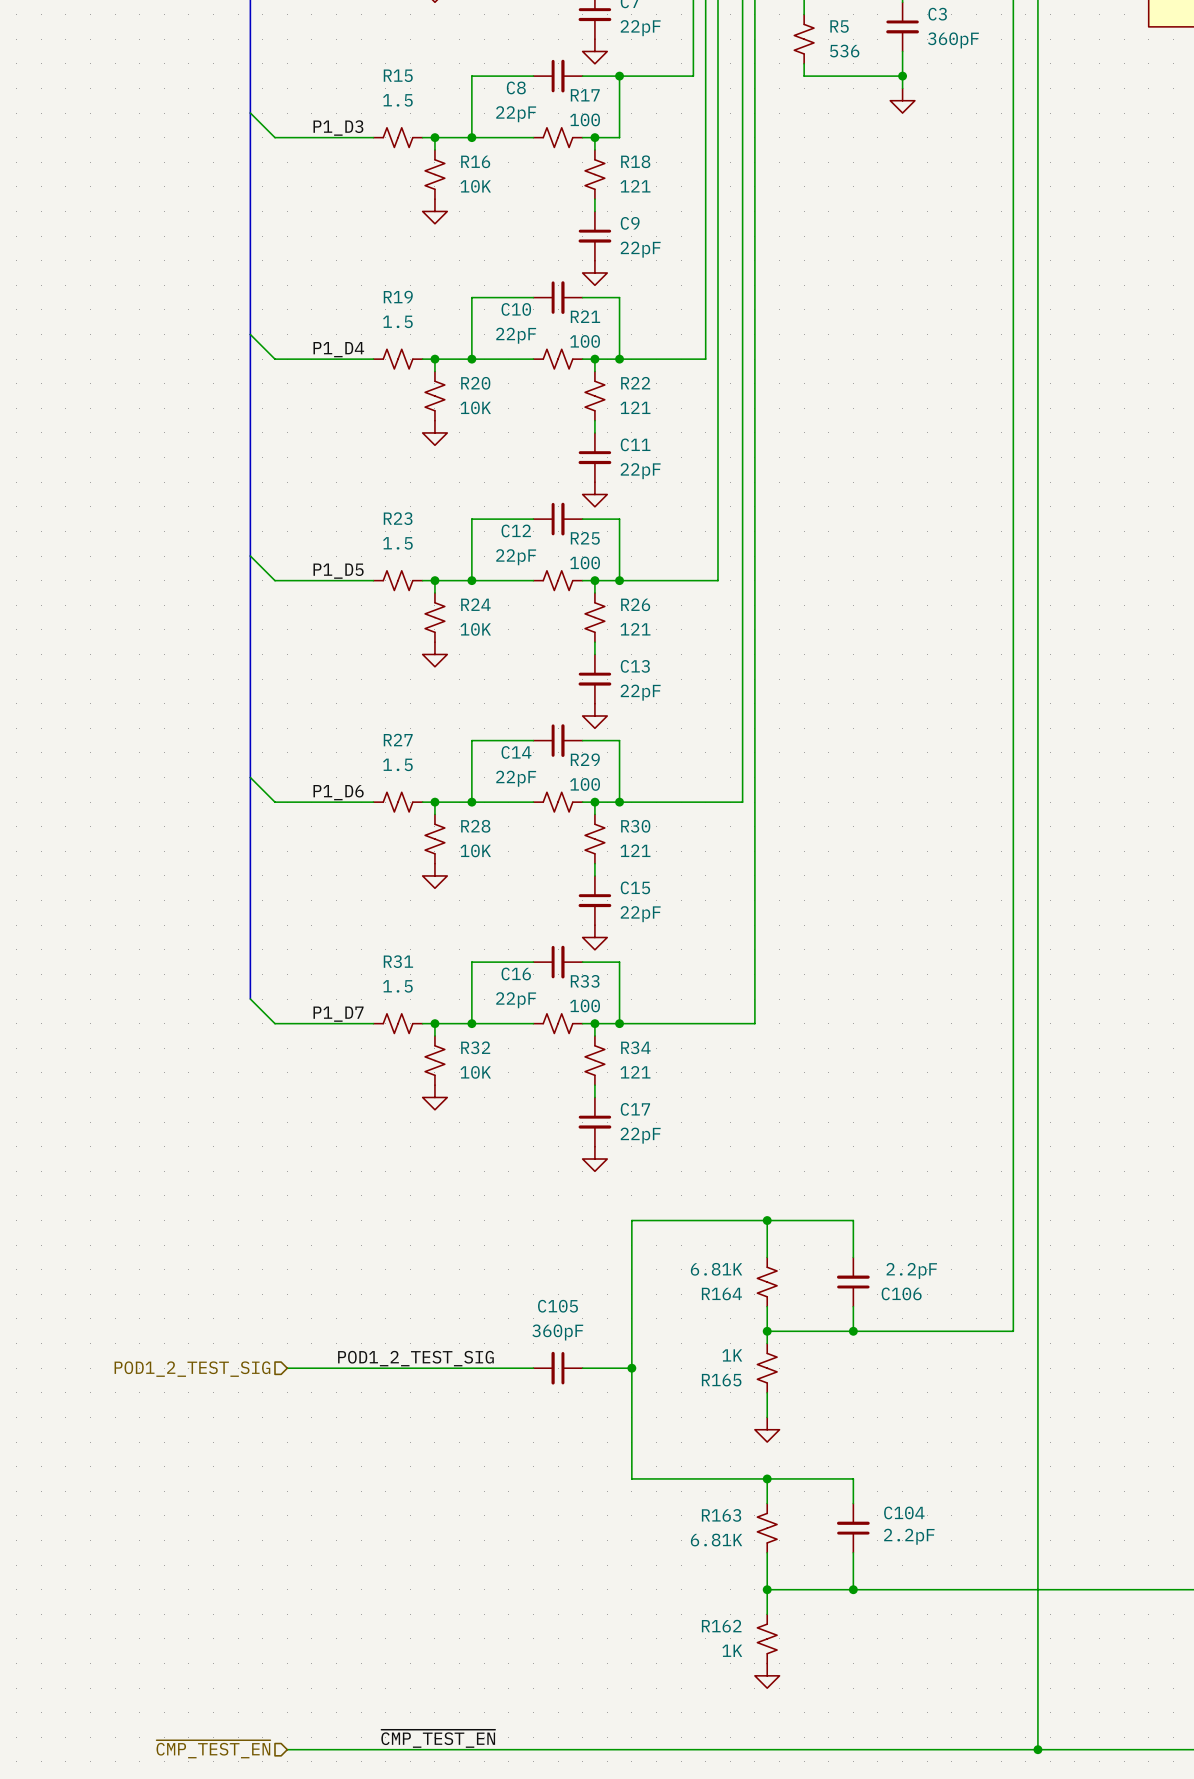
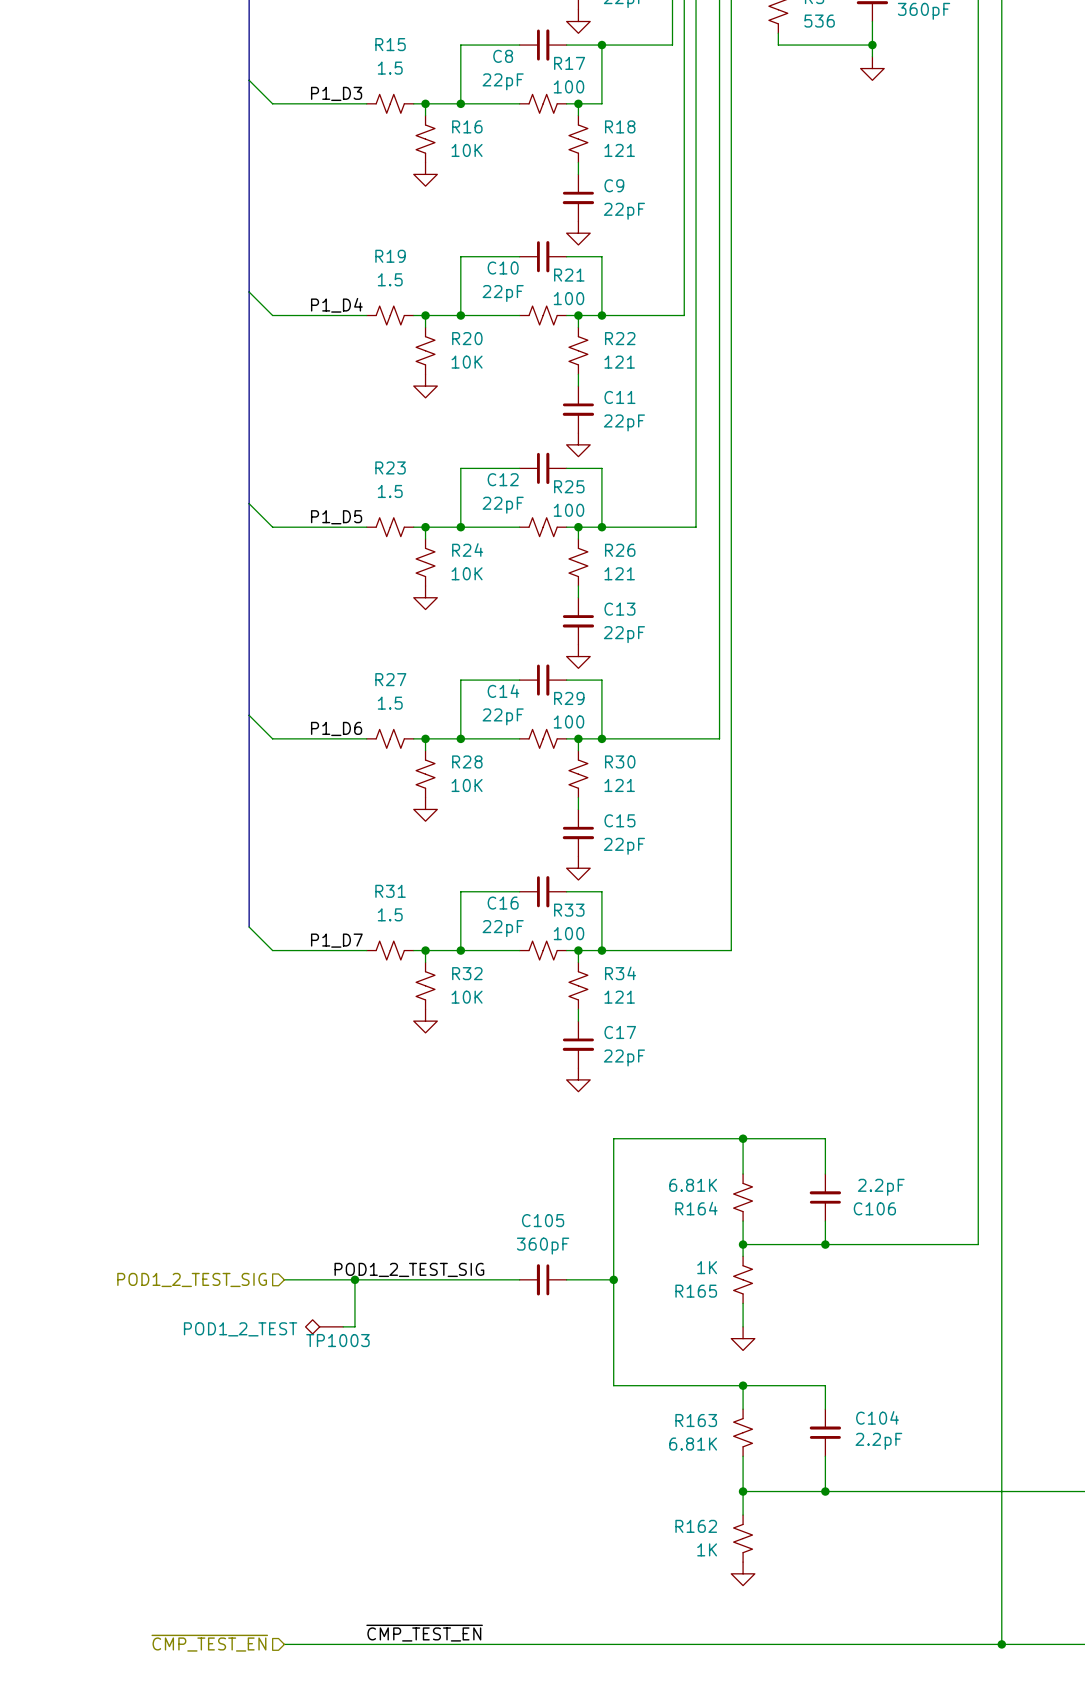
wire: none -> (354, 1279) (354, 1326) (343, 1326)
junction: none -> (354, 1279)
TP1003: none -> POD1_2_TEST (324, 1326)

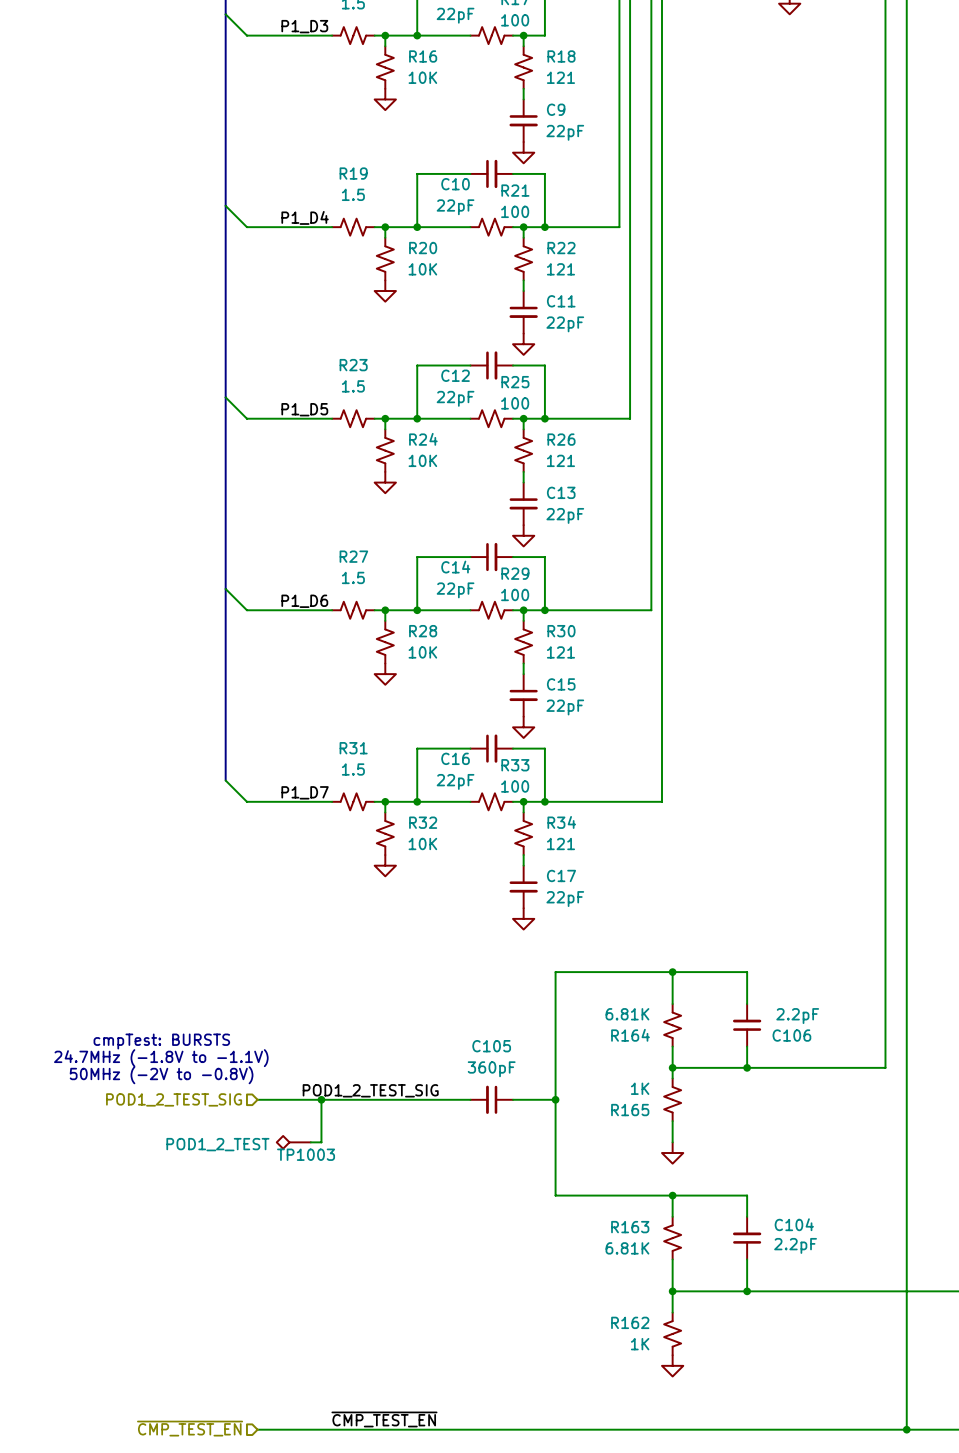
text: none -> cmpTest: BURSTS (161, 1041)
text: none -> 24.7MHz (-1.8V to -1.1V) (161, 1058)
text: none -> 50MHz (-2V to -0.8V) (161, 1075)

